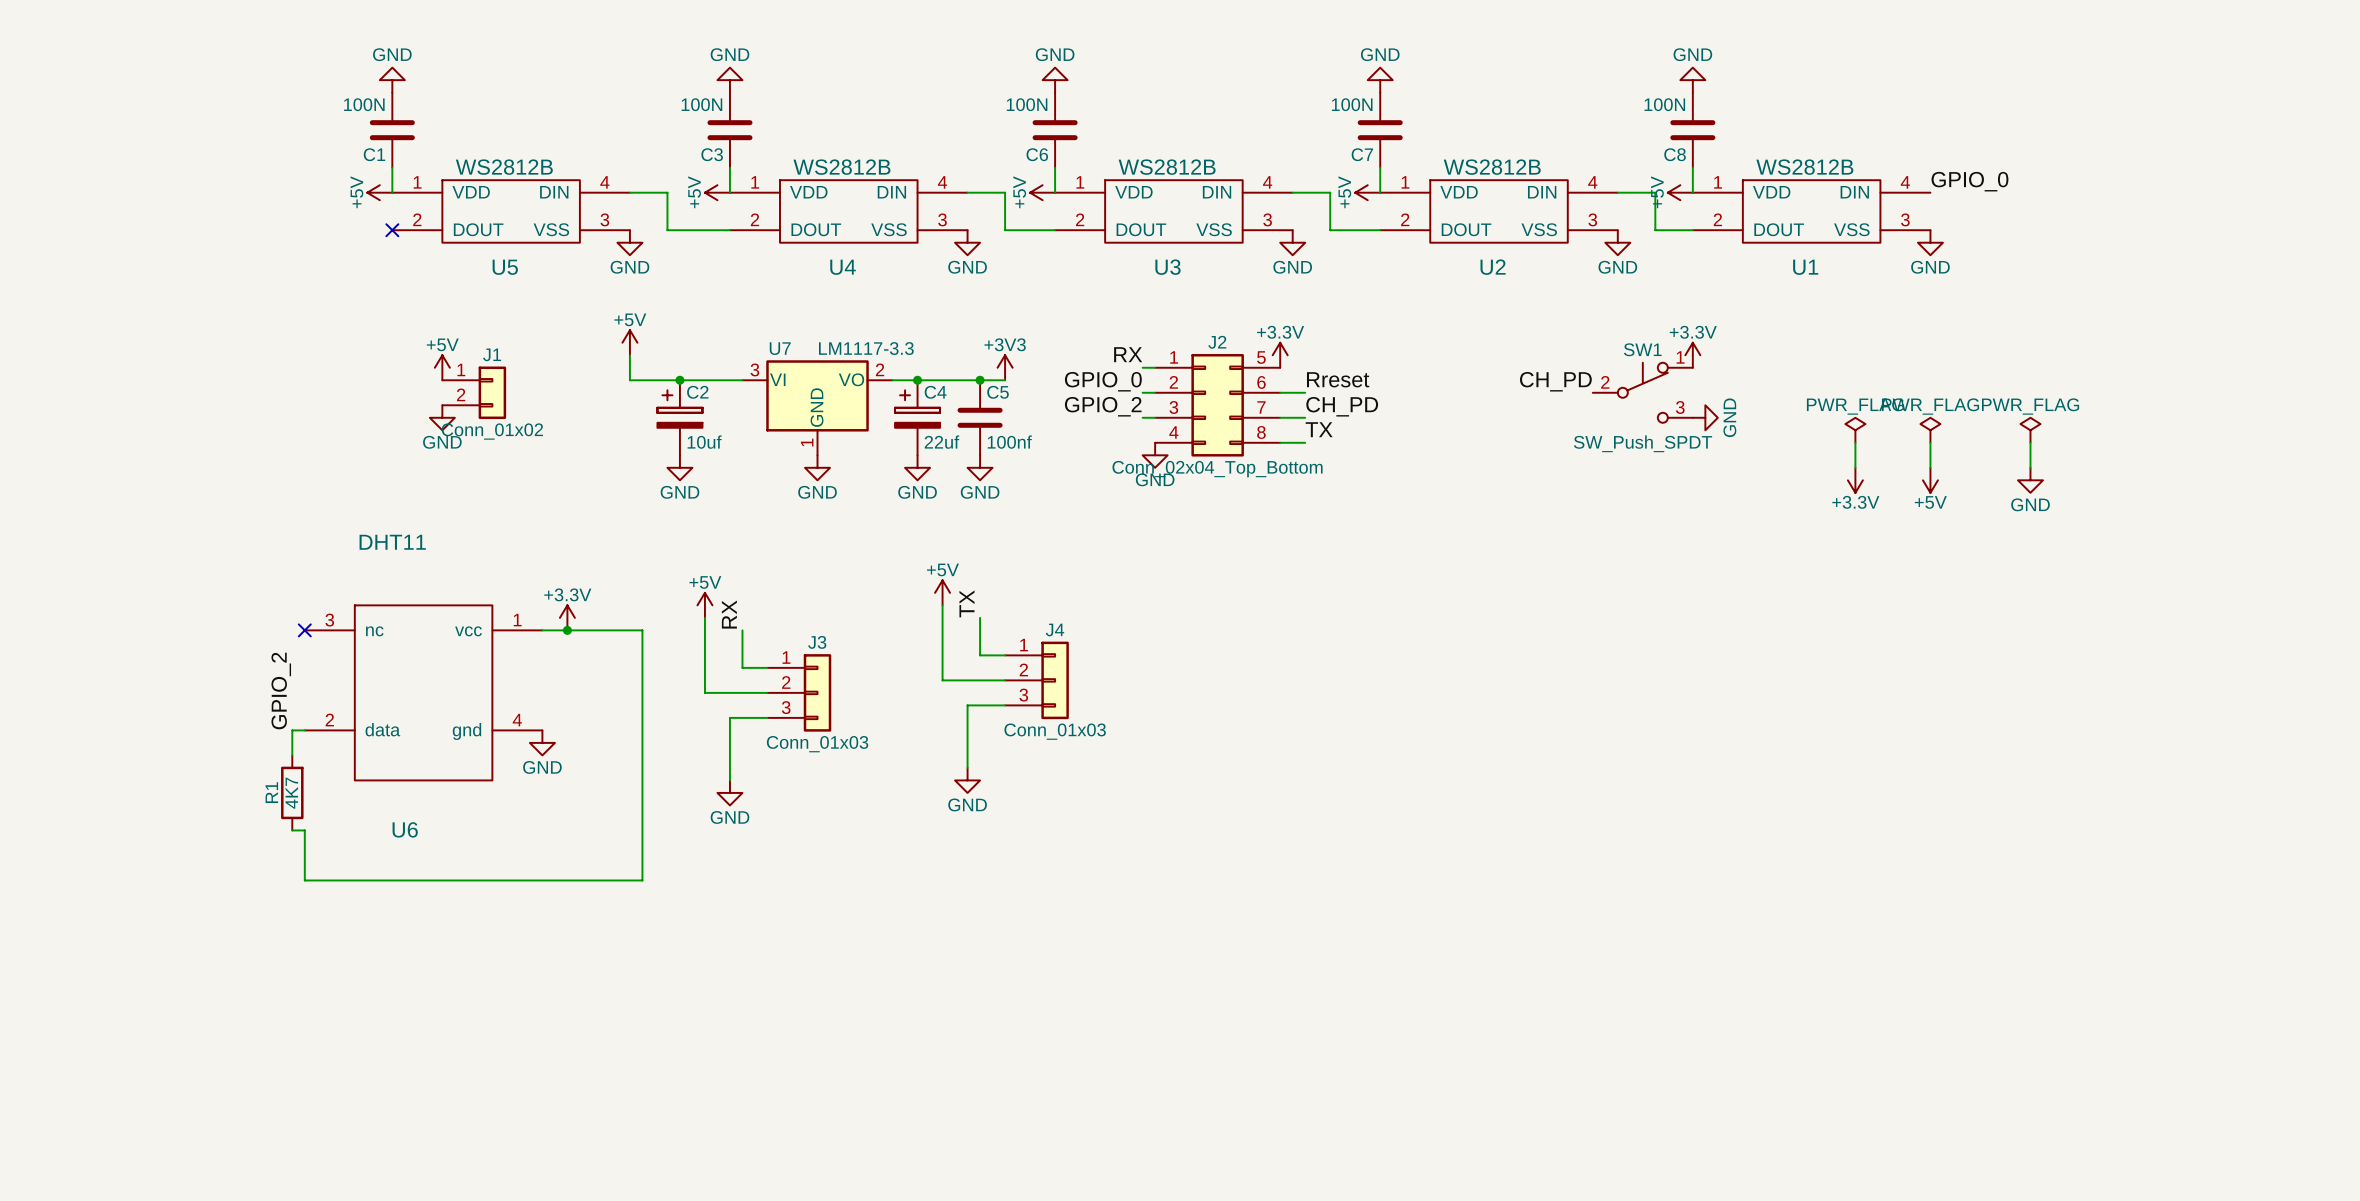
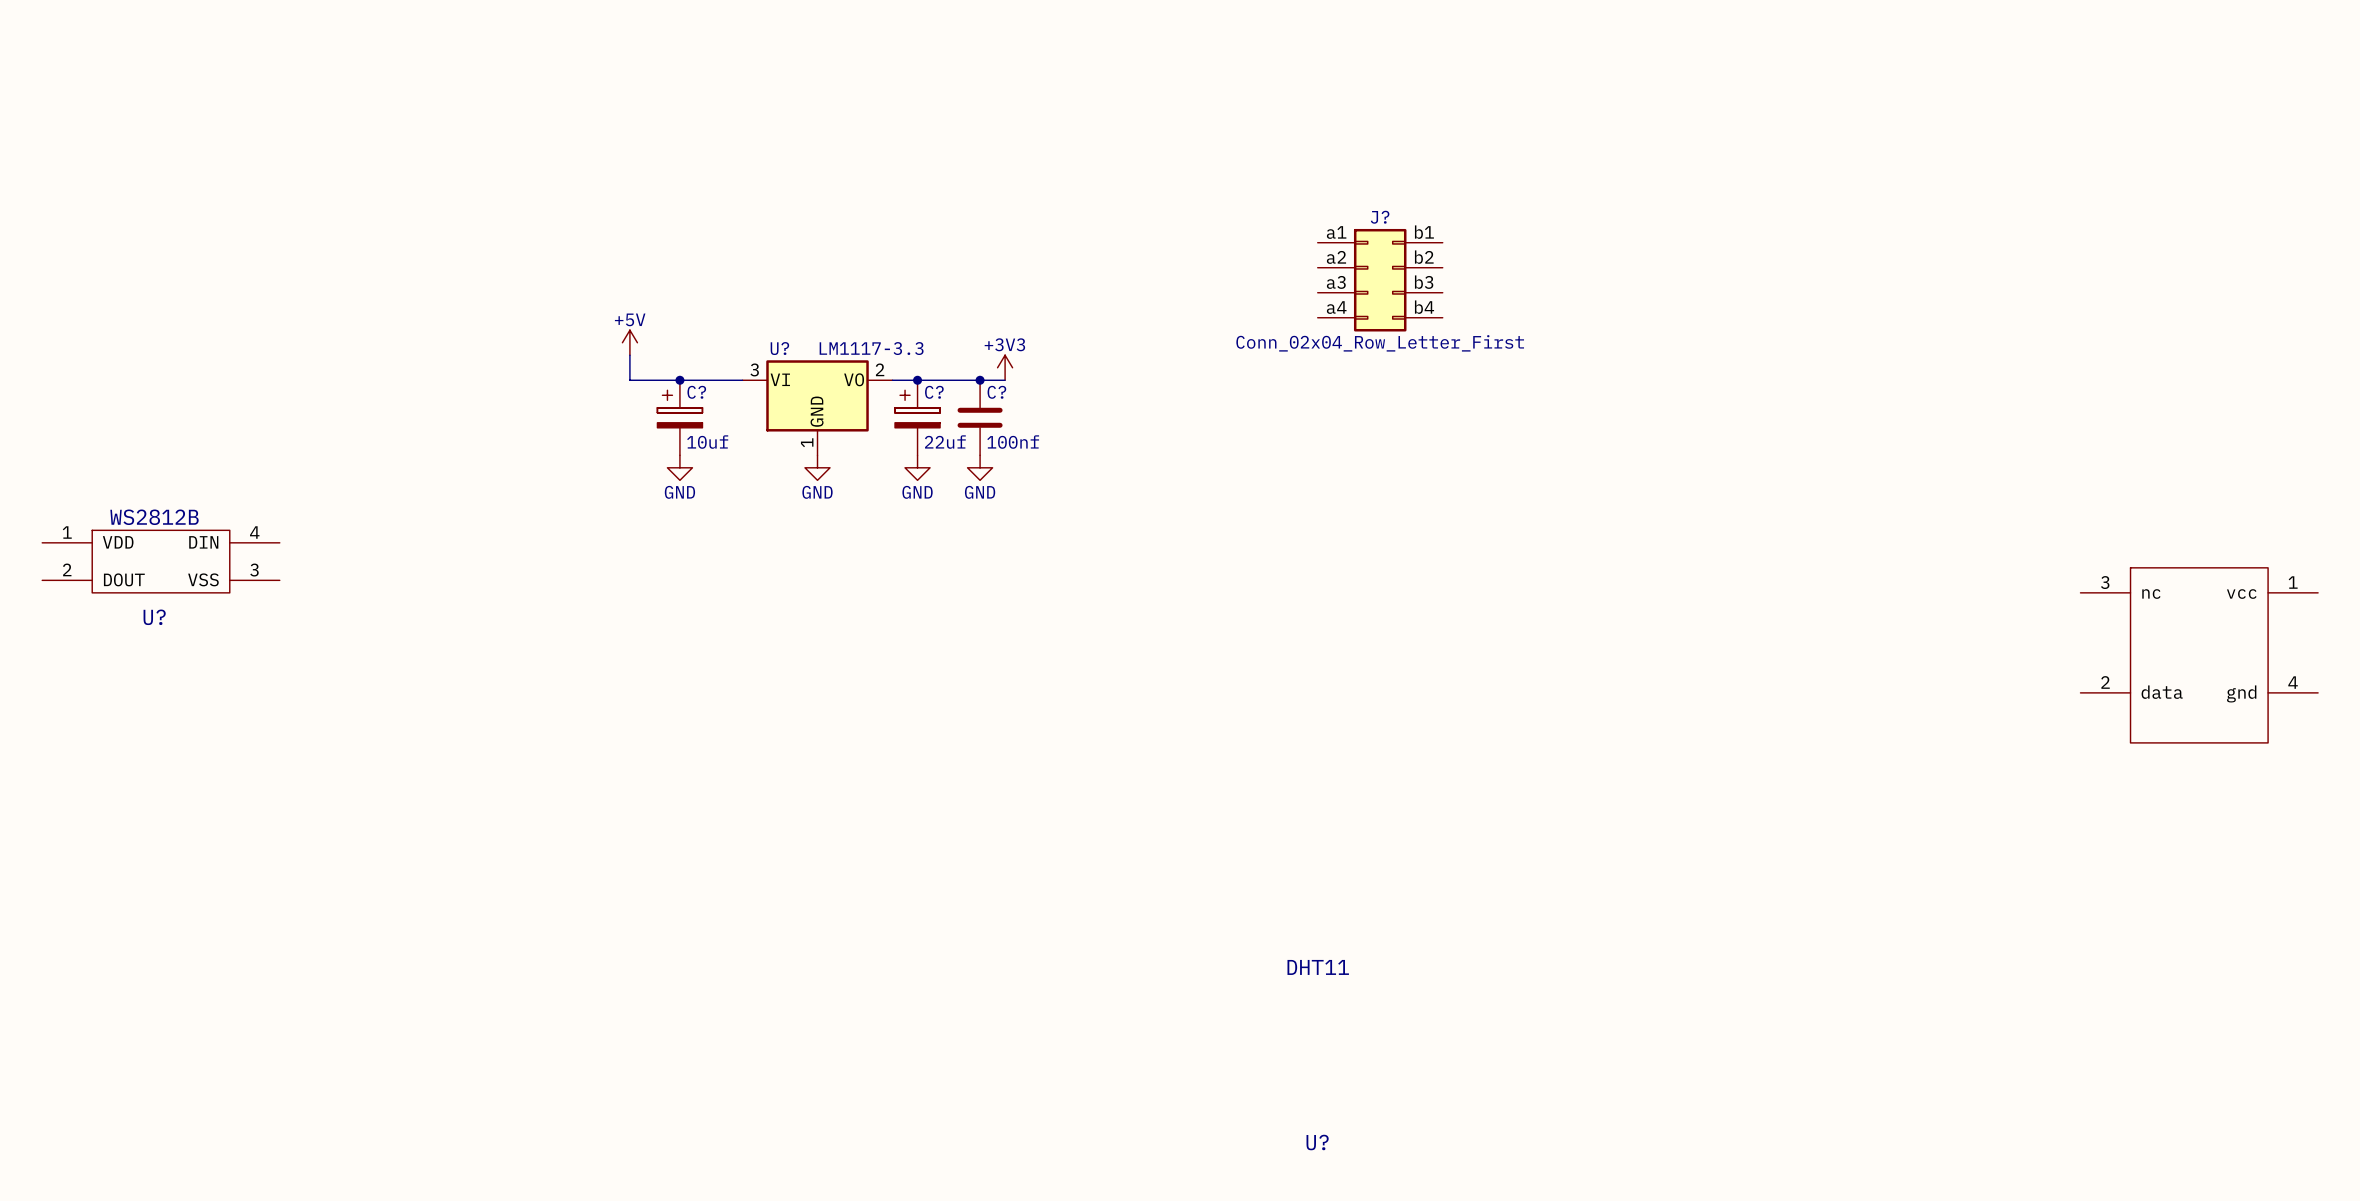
power symbol: GND (392, 80) -> none
power symbol: GND (729, 80) -> none
power symbol: GND (1055, 80) -> none
power symbol: GND (1380, 80) -> none
power symbol: GND (1692, 80) -> none
C1: 100N (392, 130) -> none
C3: 100N (729, 130) -> none
C6: 100N (1055, 130) -> none
C7: 100N (1380, 130) -> none
C8: 100N (1692, 130) -> none
wire: (392, 167) (392, 192) -> none
wire: (729, 167) (729, 192) -> none
wire: (1055, 167) (1055, 192) -> none
wire: (1380, 167) (1380, 192) -> none
wire: (1692, 167) (1692, 192) -> none
label: GPIO_0 (1969, 181) -> none
power symbol: +5V (379, 192) -> none
wire: (629, 192) (667, 192) (667, 230) (729, 230) -> none
power symbol: +5V (717, 192) -> none
wire: (967, 192) (1005, 192) (1005, 230) (1055, 230) -> none
power symbol: +5V (1042, 192) -> none
wire: (1292, 192) (1330, 192) (1330, 230) (1380, 230) -> none
power symbol: +5V (1367, 192) -> none
wire: (1617, 192) (1655, 192) (1655, 230) (1692, 230) -> none
power symbol: +5V (1680, 192) -> none
U5: WS2812B (511, 211) -> none
U4: WS2812B (848, 211) -> none
U3: WS2812B (1173, 211) -> none
U2: WS2812B (1499, 211) -> none
U1: WS2812B (1811, 211) -> none
no-connect mark: (392, 230) -> none
power symbol: GND (629, 242) -> none
power symbol: GND (967, 242) -> none
power symbol: GND (1292, 242) -> none
power symbol: GND (1617, 242) -> none
power symbol: GND (1930, 242) -> none
J?: none -> Conn_02x04_Row_Letter_First (1380, 280)
U7 name: U7 (780, 348) -> U? (779, 348)
label: RX (1128, 354) -> none
power symbol: +3.3V (1280, 355) -> none
power symbol: +3.3V (1692, 355) -> none
power symbol: +5V (442, 367) -> none
wire: (1142, 367) (1155, 367) -> none
label: Rreset (1338, 379) -> none
label: GPIO_0 (1103, 381) -> none
label: CH_PD (1555, 381) -> none
J1: Conn_01x02 (474, 392) -> none
C2 name: C2 (697, 392) -> C? (696, 392)
C4 name: C4 (935, 392) -> C? (934, 392)
C5 name: C5 (998, 392) -> C? (996, 392)
wire: (1142, 392) (1155, 392) -> none
wire: (1280, 392) (1305, 392) -> none
SW1: SW_Push_SPDT (1642, 392) -> none
J2: Conn_02x04_Top_Bottom (1217, 405) -> none
label: GPIO_2 (1103, 406) -> none
label: CH_PD (1342, 406) -> none
power symbol: GND (442, 417) -> none
wire: (1142, 417) (1155, 417) -> none
wire: (1280, 417) (1305, 417) -> none
power symbol: GND (1705, 417) -> none
label: TX (1319, 429) -> none
power symbol: PWR_FLAG (1855, 430) -> none
power symbol: PWR_FLAG (1930, 430) -> none
power symbol: PWR_FLAG (2030, 430) -> none
wire: (1280, 442) (1305, 442) -> none
wire: (1855, 442) (1855, 467) -> none
wire: (1930, 442) (1930, 467) -> none
wire: (2030, 442) (2030, 467) -> none
power symbol: GND (1155, 455) -> none
power symbol: +3.3V (1855, 480) -> none
power symbol: +5V (1930, 480) -> none
power symbol: GND (2030, 480) -> none
U?: none -> WS2812B (161, 561)
power symbol: +5V (942, 592) -> none
label: TX (966, 603) -> none
power symbol: +5V (704, 605) -> none
wire: (942, 605) (942, 680) (1005, 680) -> none
label: RX (729, 614) -> none
power symbol: +3.3V (567, 617) -> none
wire: (704, 617) (704, 692) (767, 692) -> none
wire: (980, 617) (980, 655) (1005, 655) -> none
no-connect mark: (304, 630) -> none
wire: (542, 630) (642, 630) (642, 880) (304, 880) (304, 830) (292, 830) -> none
junction: (567, 630) -> none
wire: (742, 630) (742, 667) (767, 667) -> none
U?: none -> DHT11 (2199, 655)
J4: Conn_01x03 (1036, 680) -> none
label: GPIO_2 (281, 691) -> none
U6: DHT11 (423, 692) -> none
J3: Conn_01x03 (799, 692) -> none
wire: (1005, 705) (967, 705) (967, 767) -> none
wire: (767, 717) (729, 717) (729, 780) -> none
wire: (304, 730) (292, 730) (292, 755) -> none
power symbol: GND (542, 742) -> none
power symbol: GND (967, 780) -> none
R1: 4K7 (292, 792) -> none
power symbol: GND (729, 792) -> none

